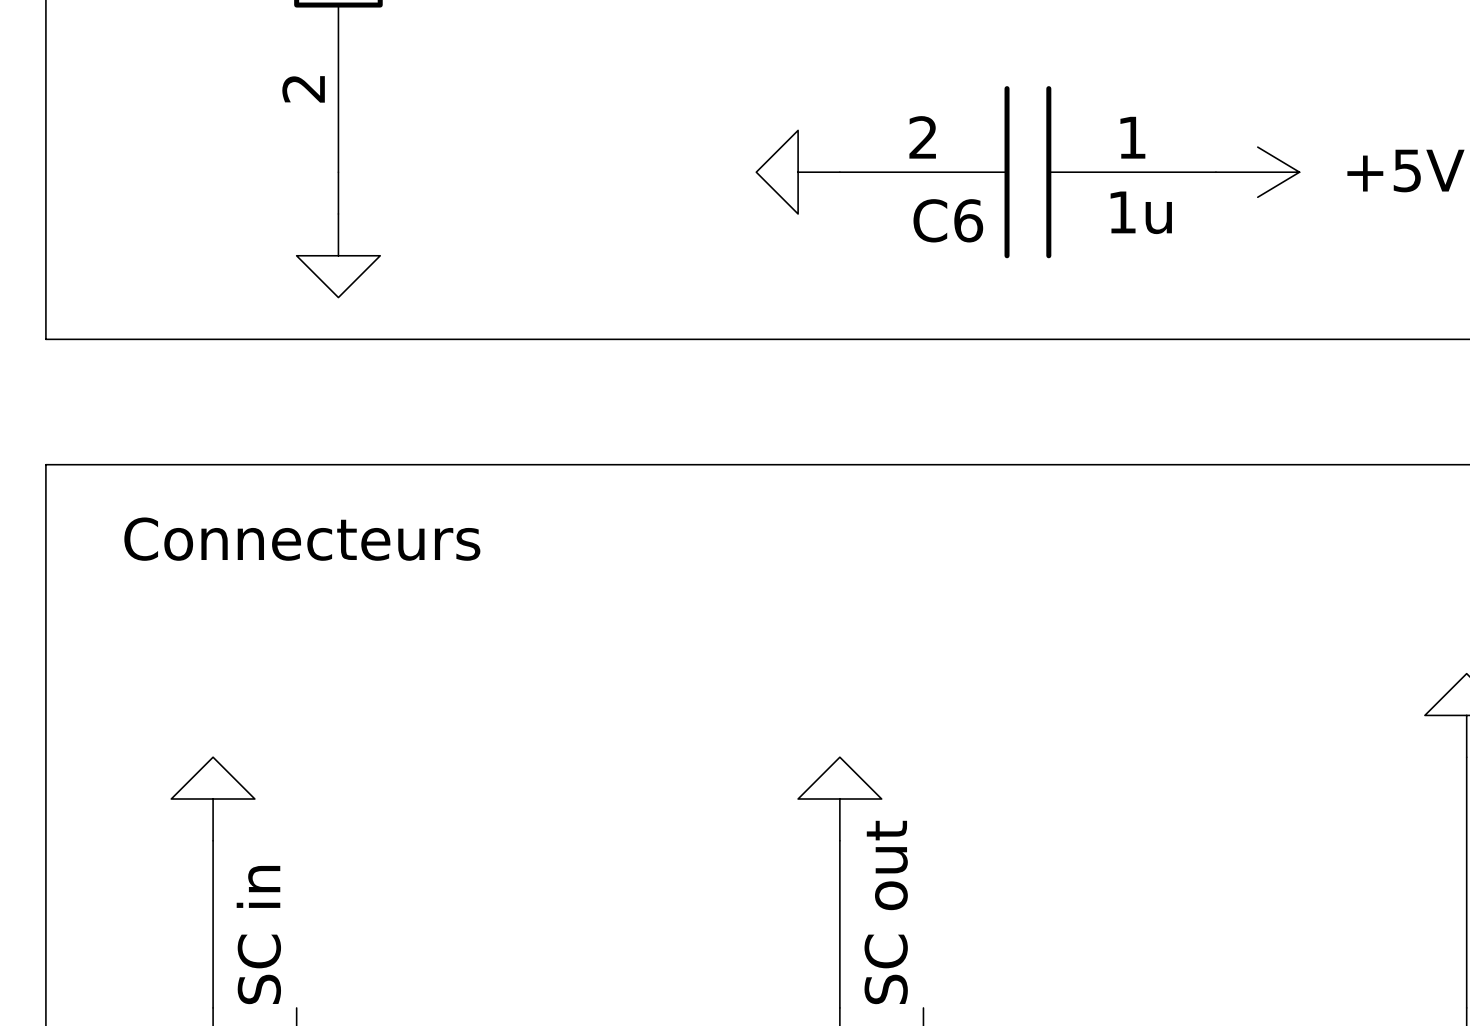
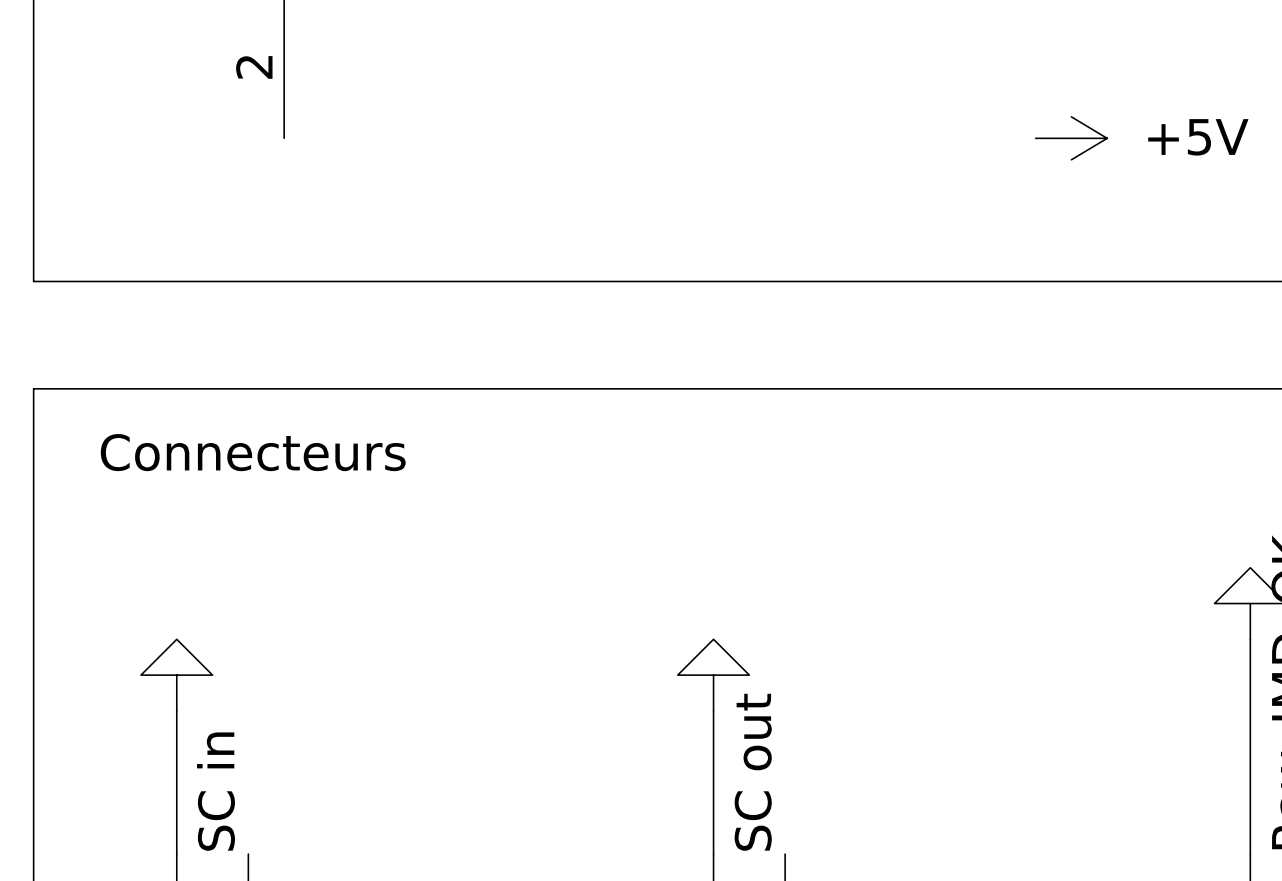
wire: (338, 172) (338, 213) -> none
power symbol: (798, 172) -> none
C6: 1u (1027, 172) -> none
power symbol: (338, 255) -> none

